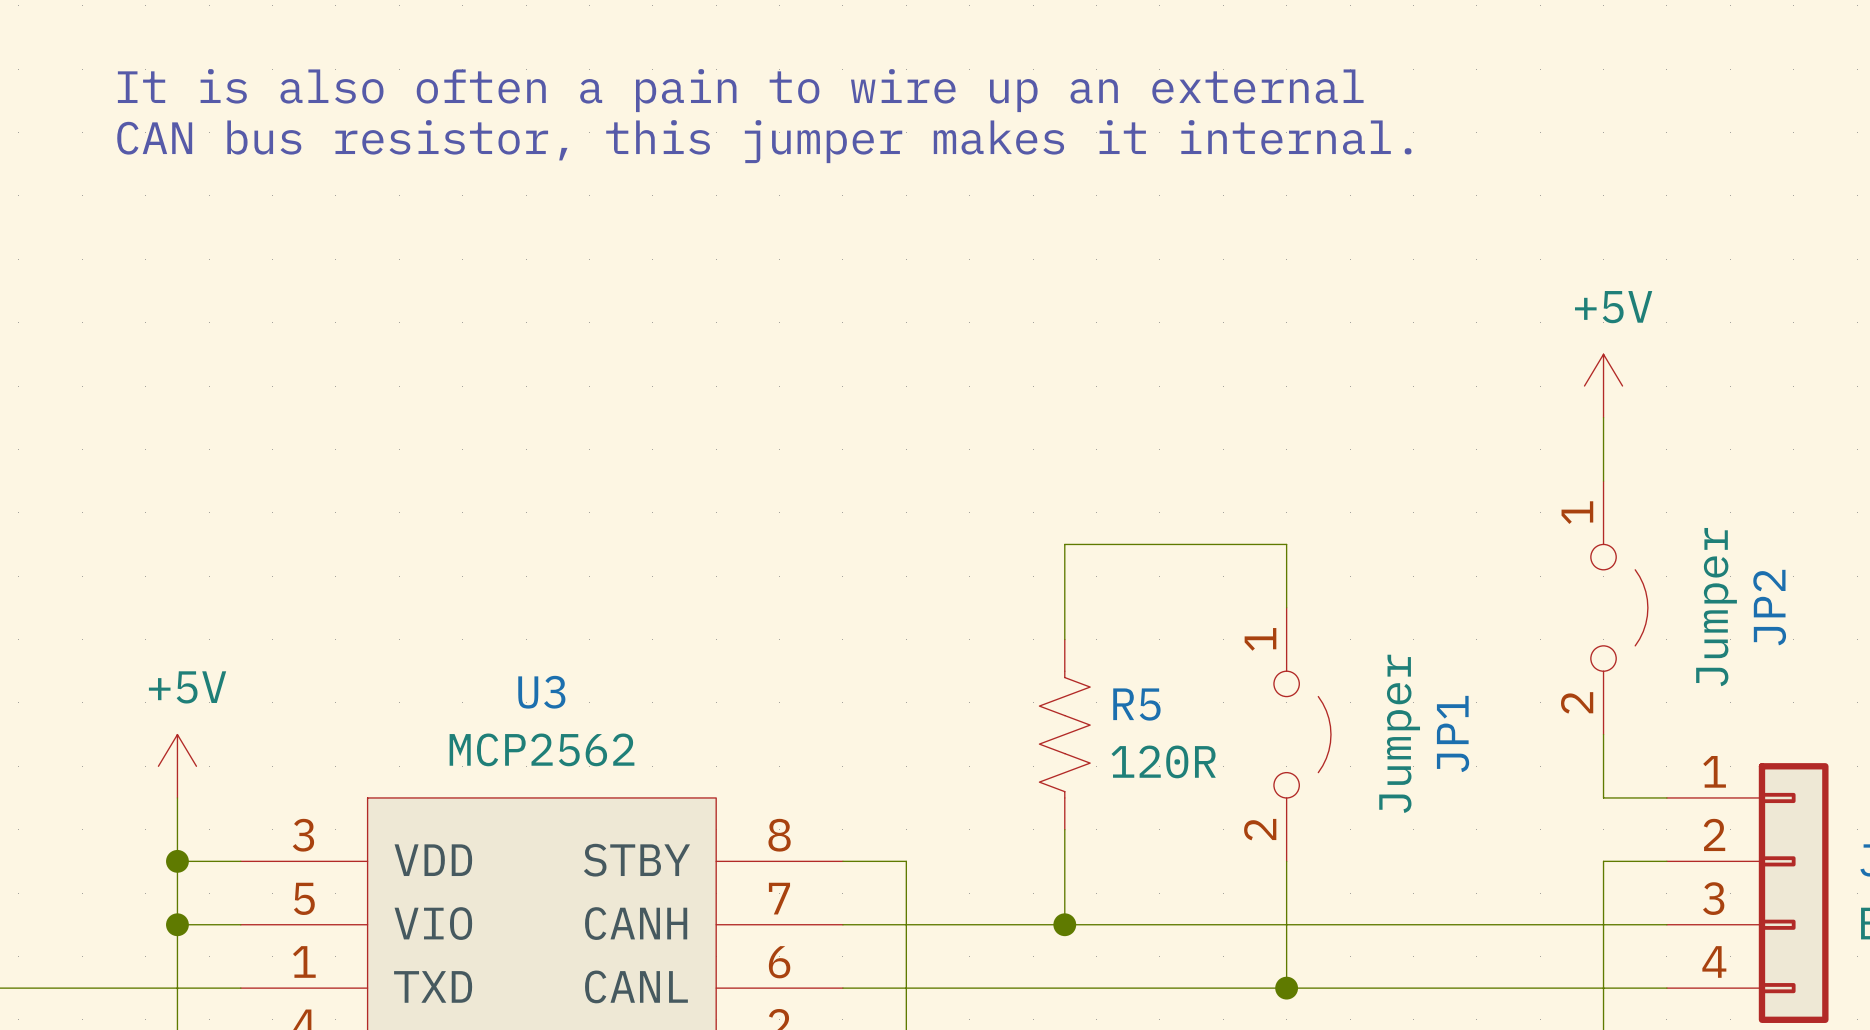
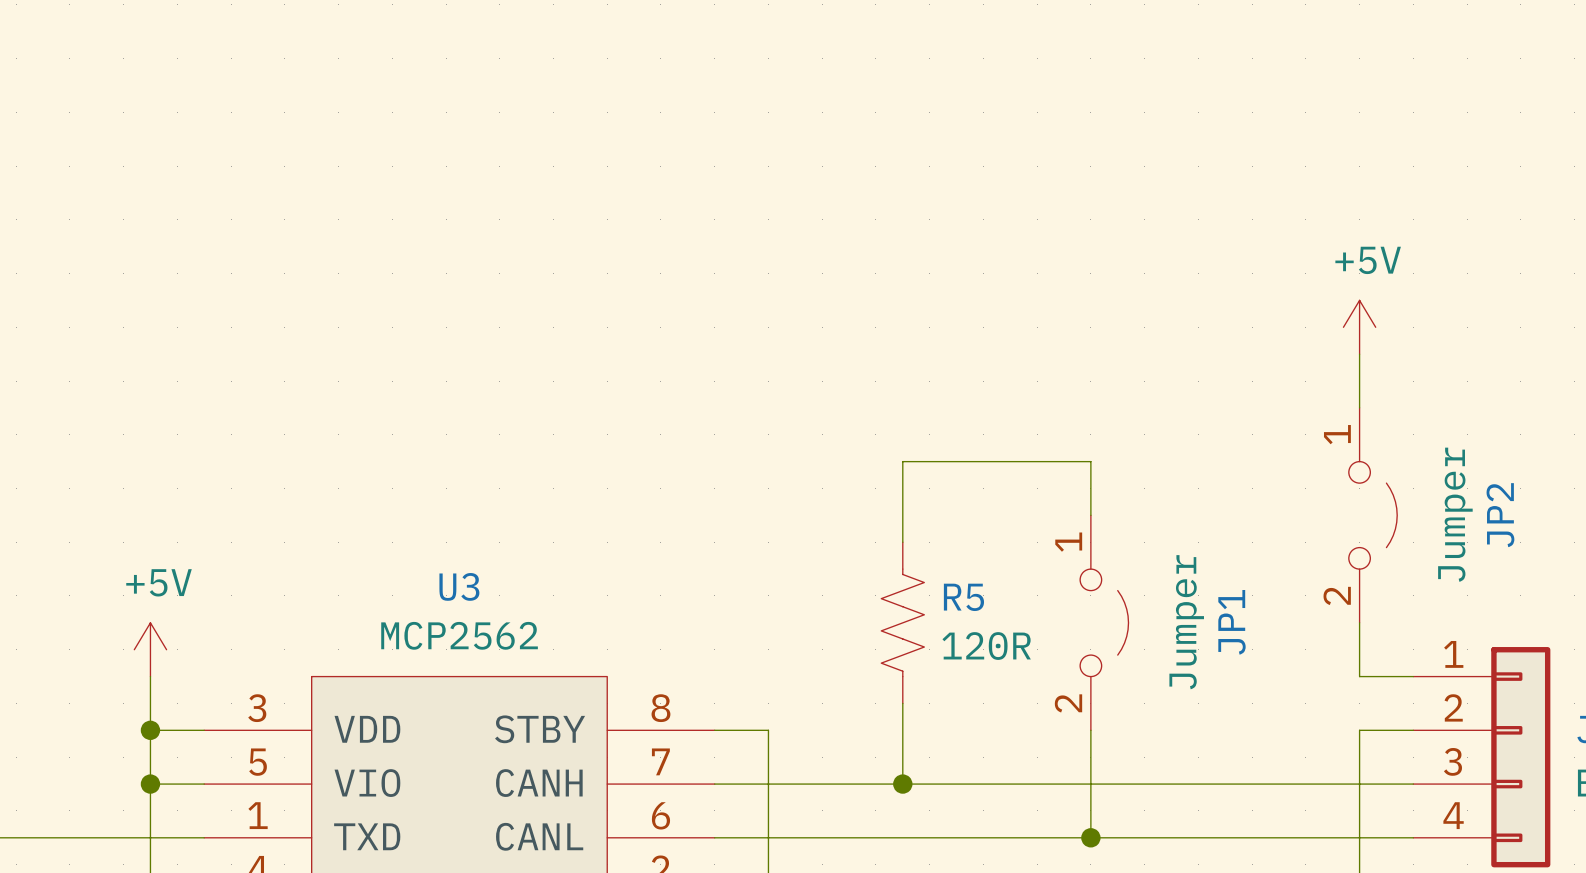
text: It is also often a pain to wire up an external (740, 90) -> none
text: CAN bus resistor, this jumper makes it internal. (764, 141) -> none

